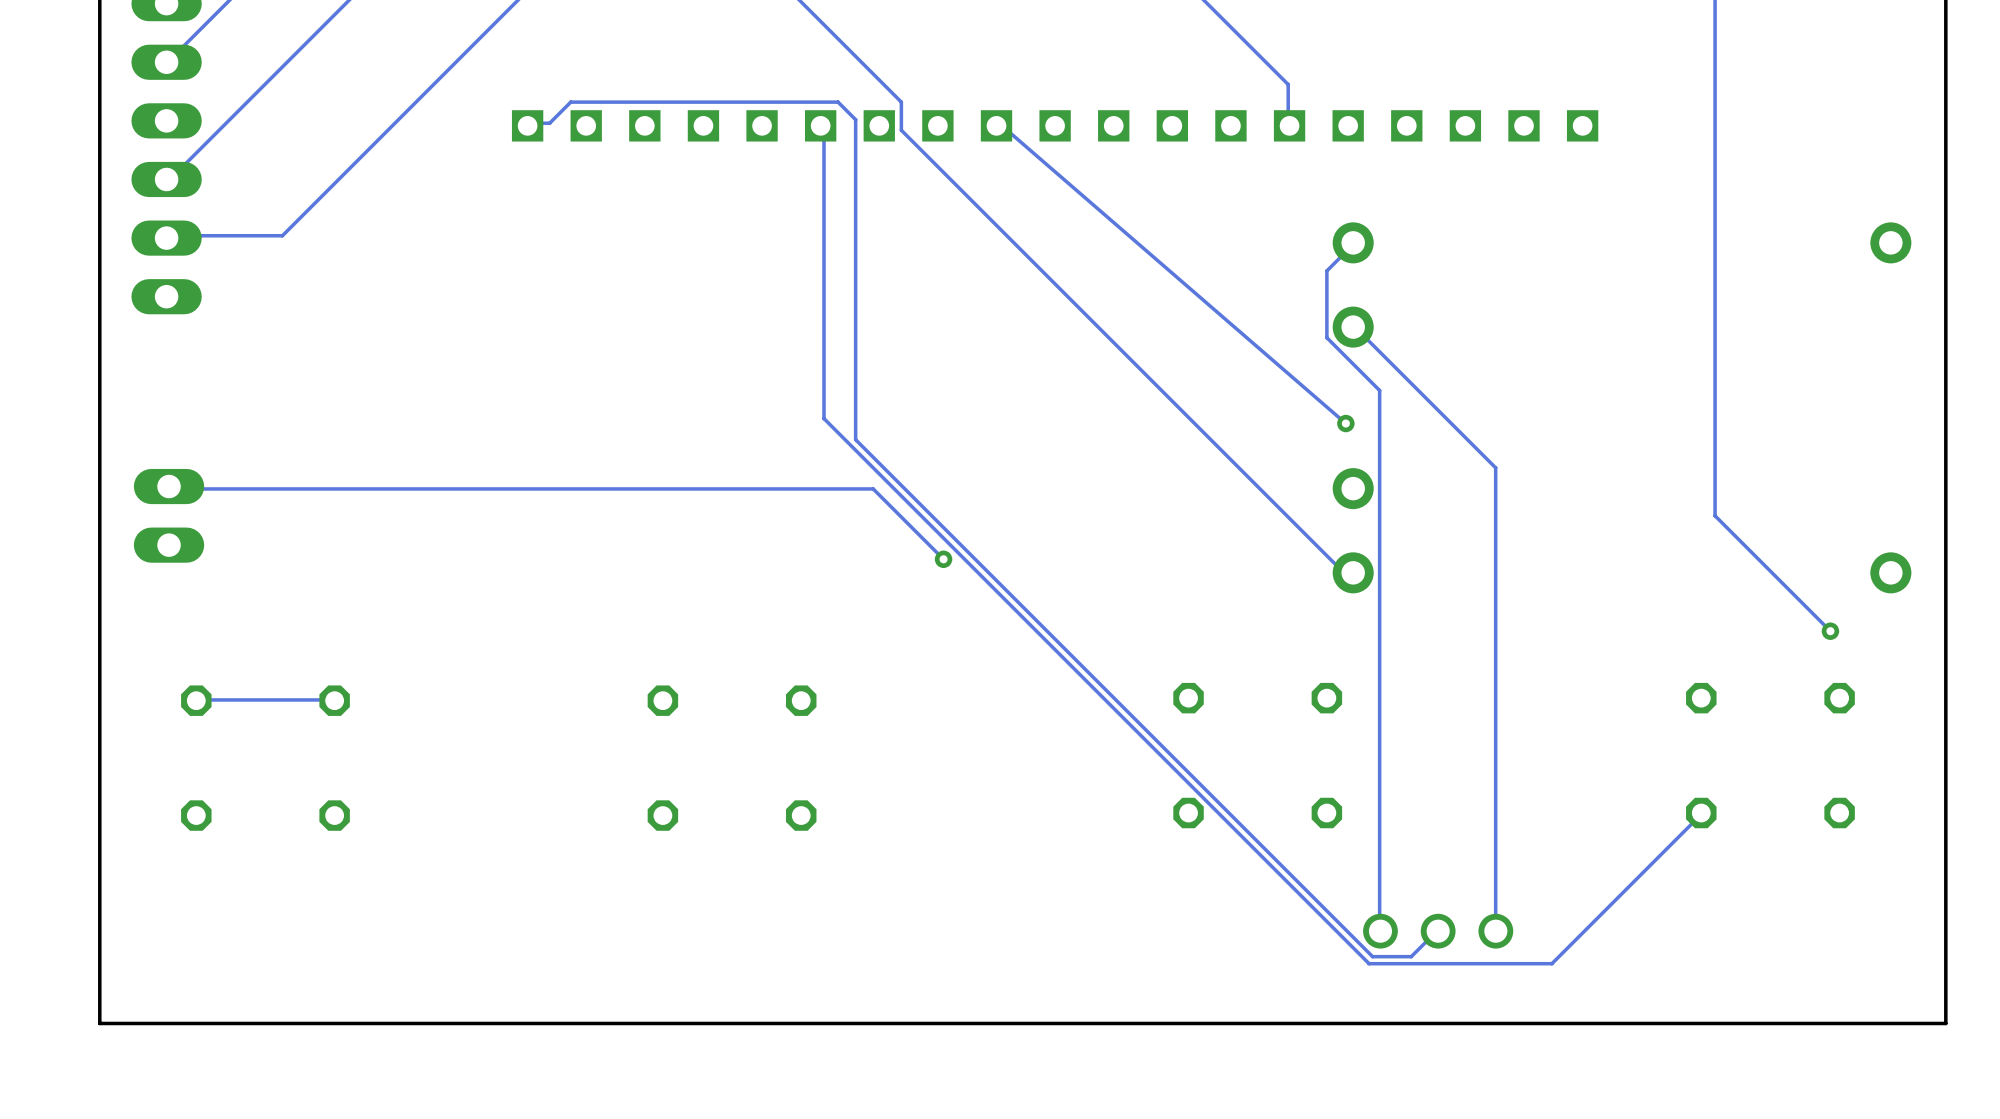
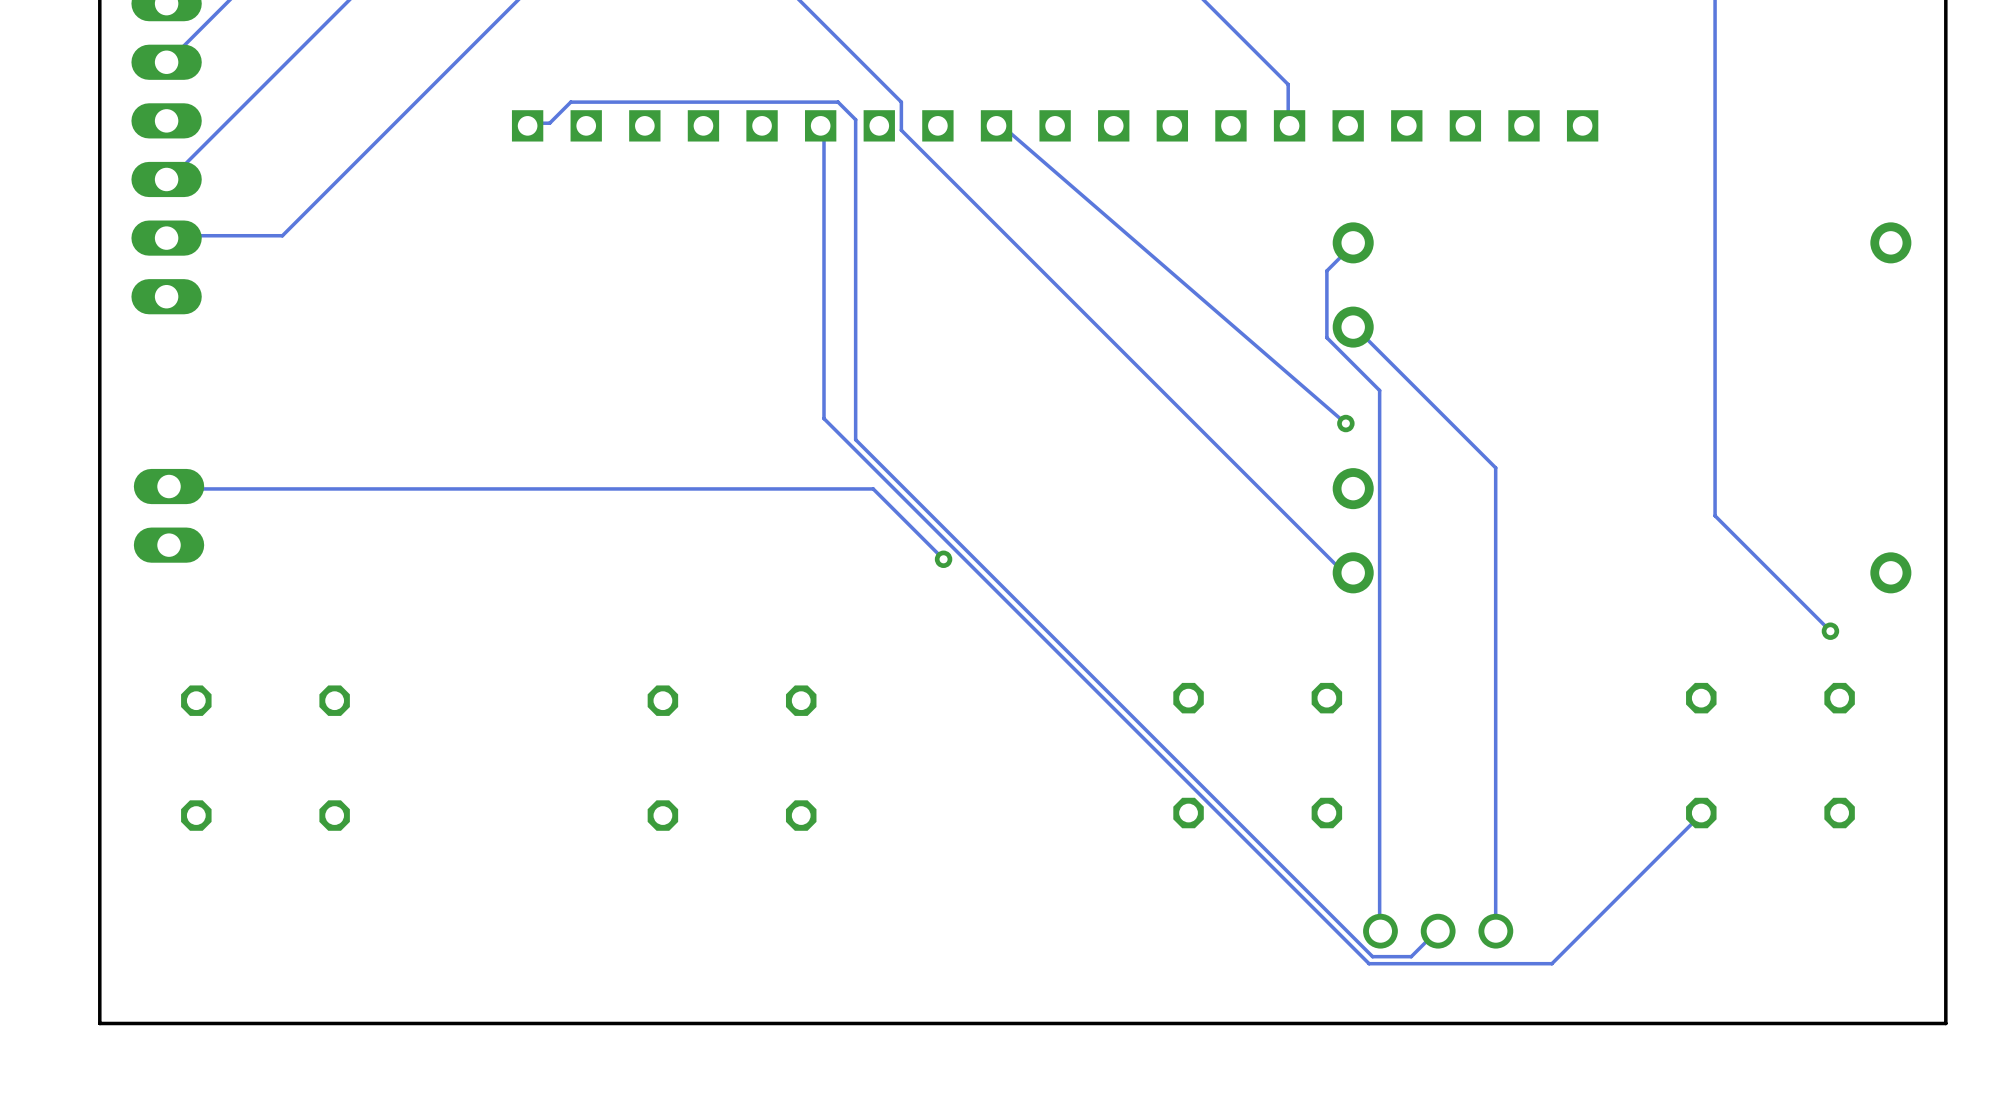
track: (334, 700) (196, 700) -> none

